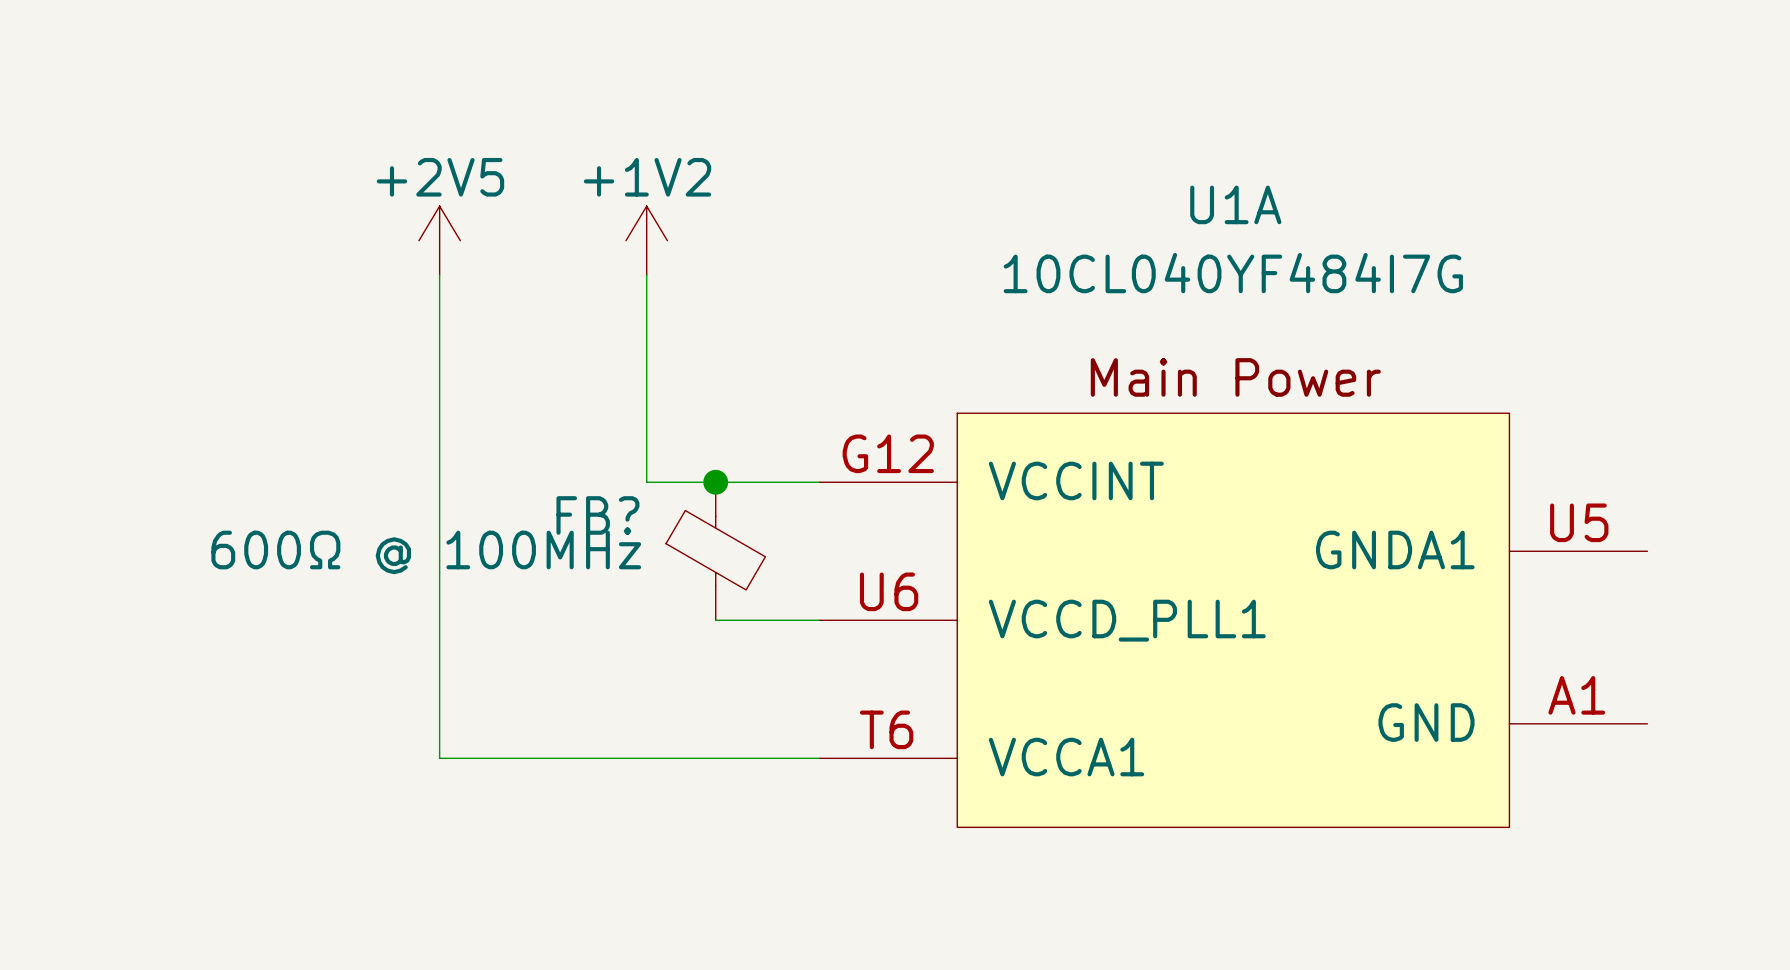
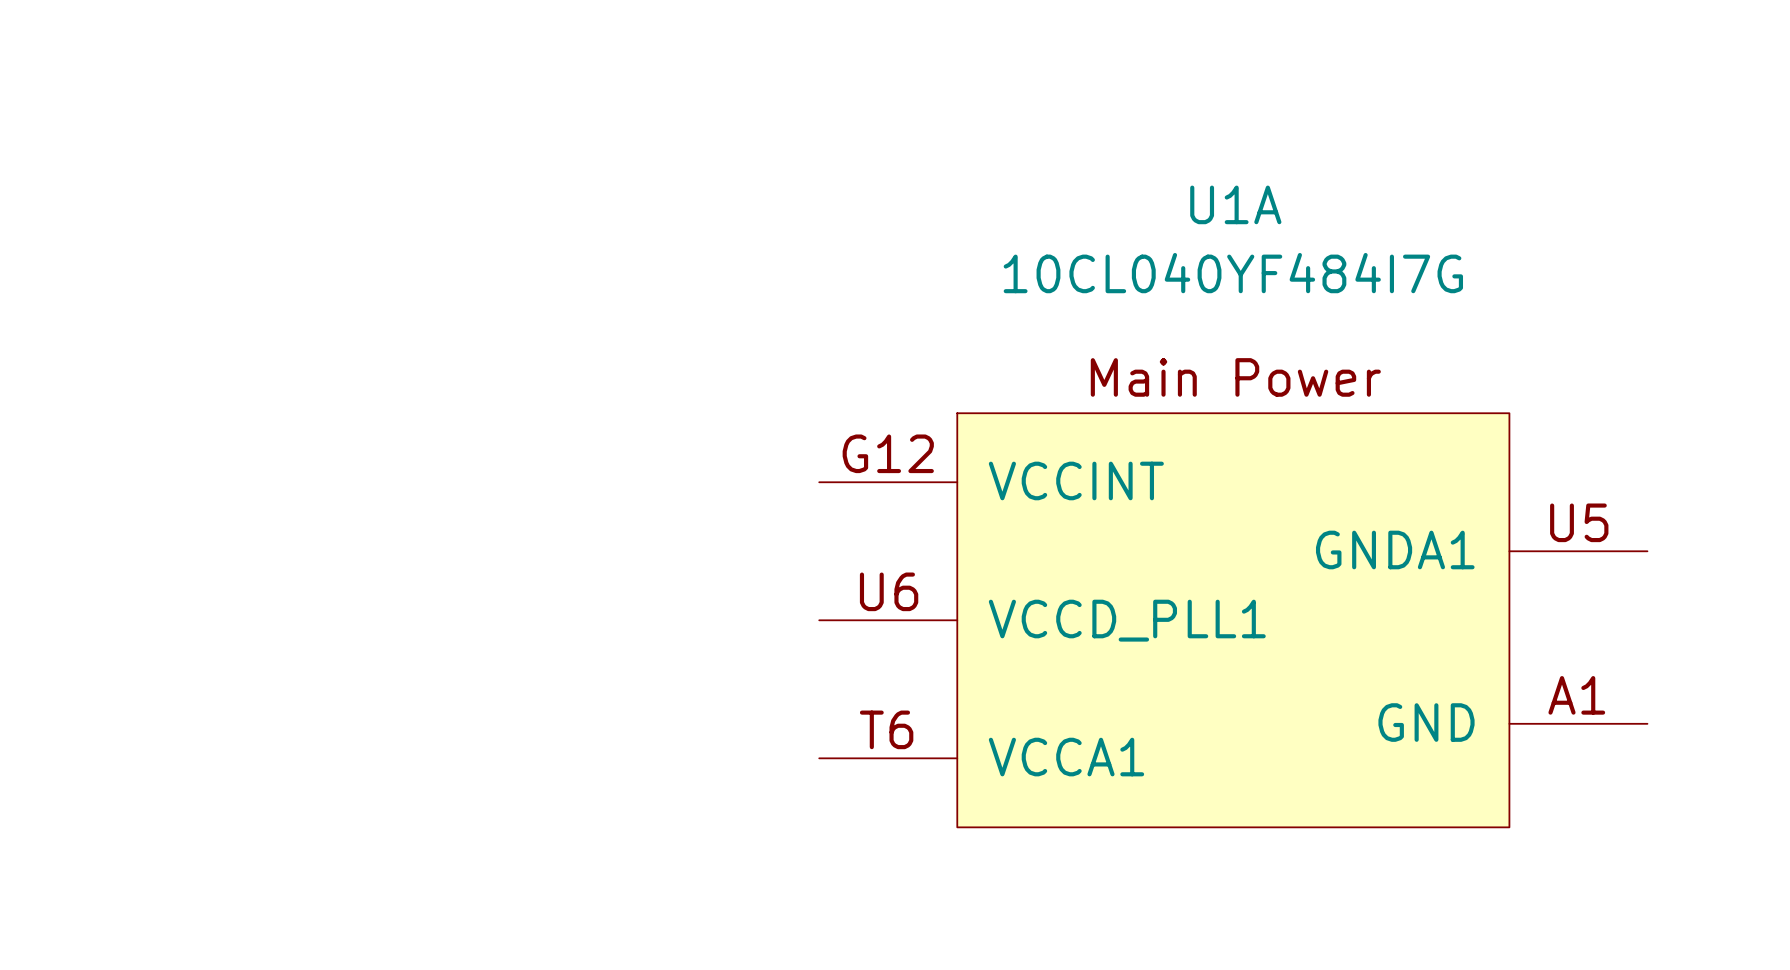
power symbol: +2V5 (439, 240) -> none
power symbol: +1V2 (646, 240) -> none
wire: (439, 275) (439, 758) (819, 758) -> none
wire: (646, 275) (646, 482) (819, 482) -> none
junction: (715, 482) -> none
FB?: 600Ω @ 100MHz (715, 551) -> none
wire: (715, 620) (819, 620) -> none

